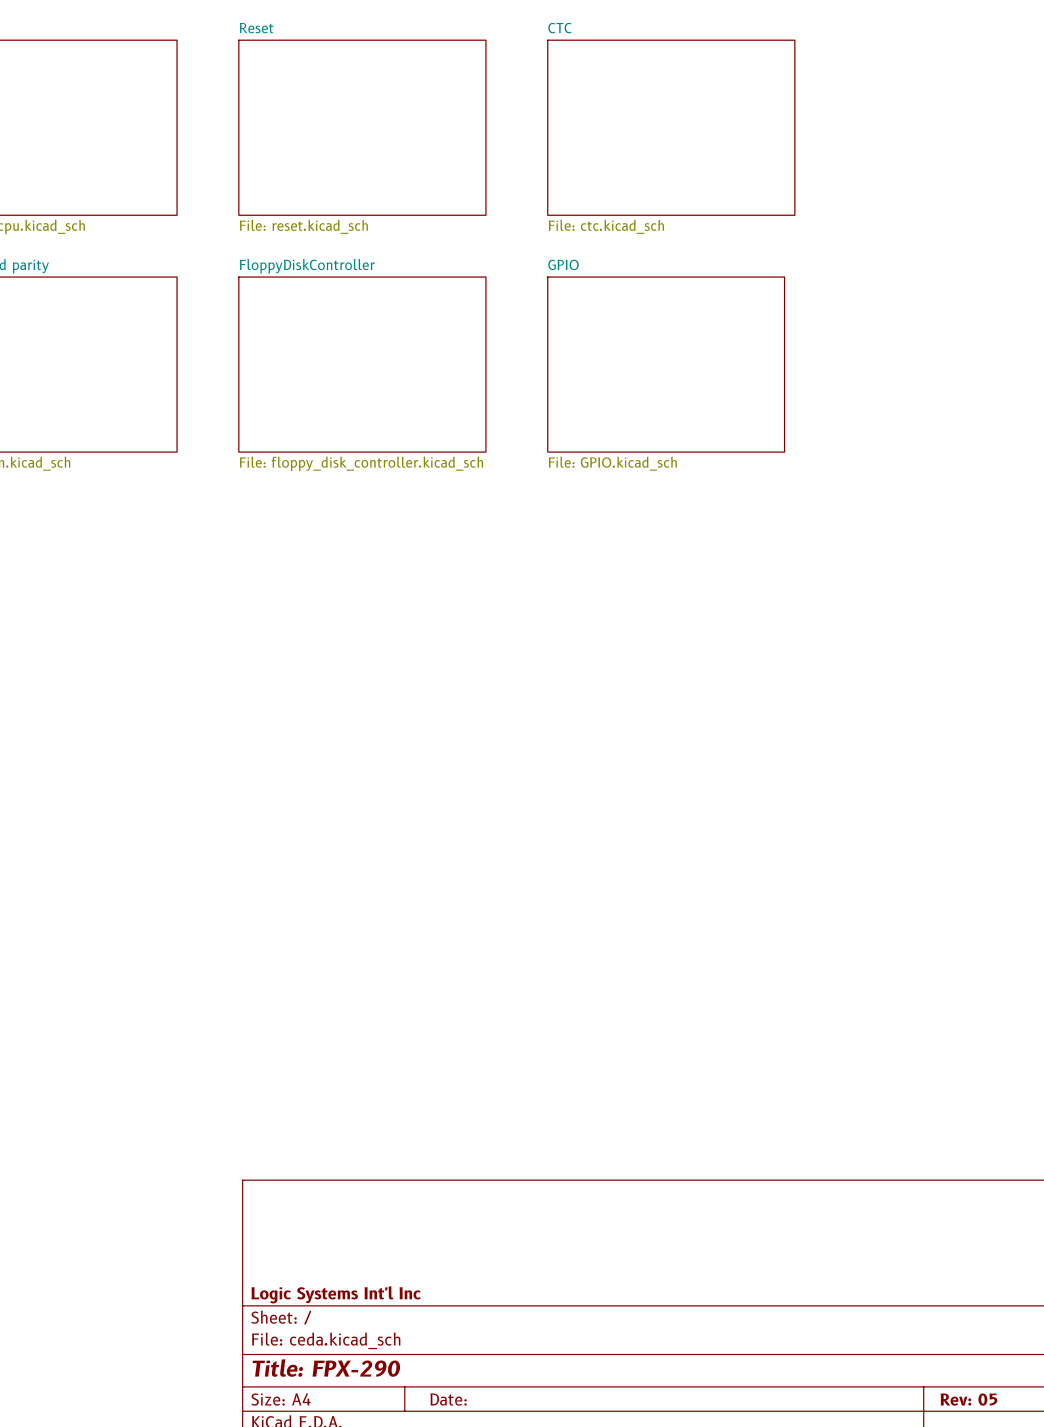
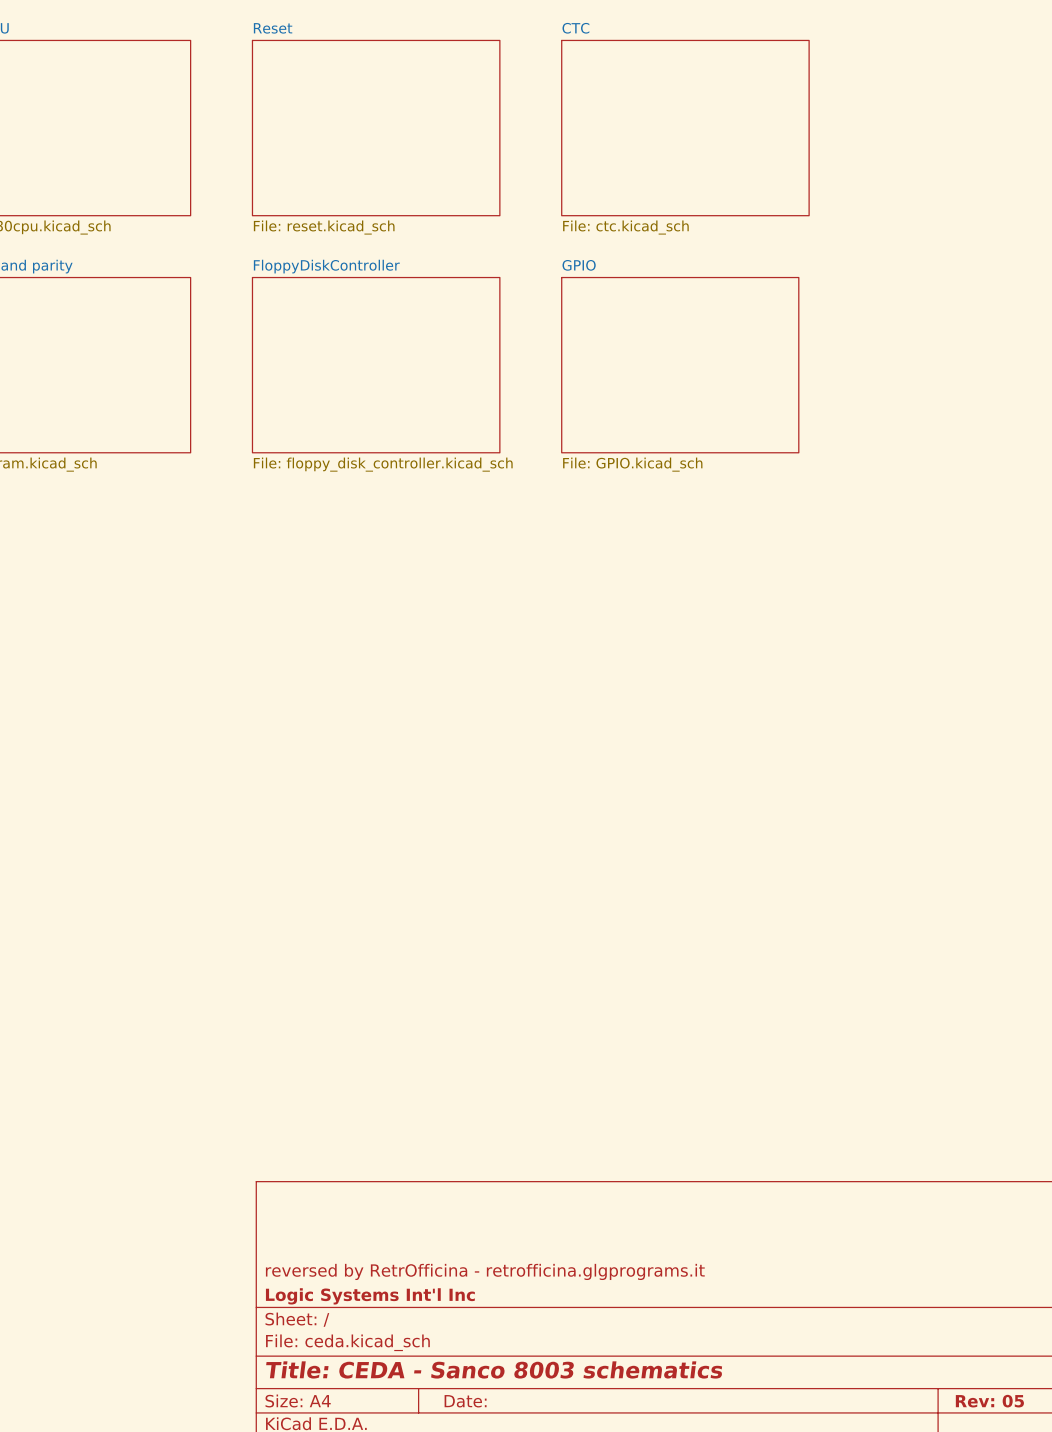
title block: none -> reversed by RetrOfficina - retrofficina.glgprograms.it (485, 1271)
title block: Title: FPX-290 (326, 1368) -> Title: CEDA - Sanco 8003 schematics (494, 1369)

